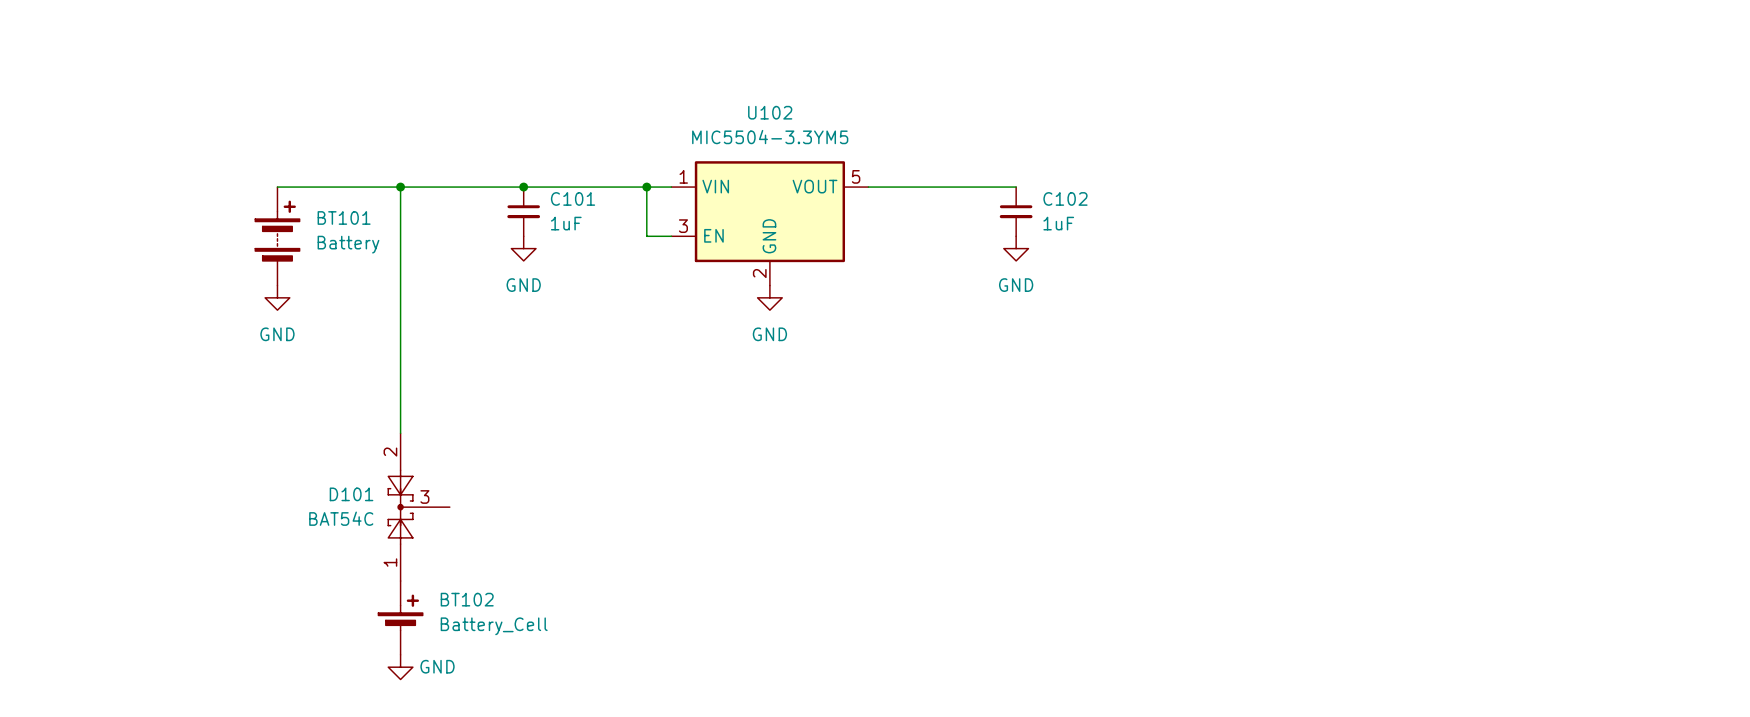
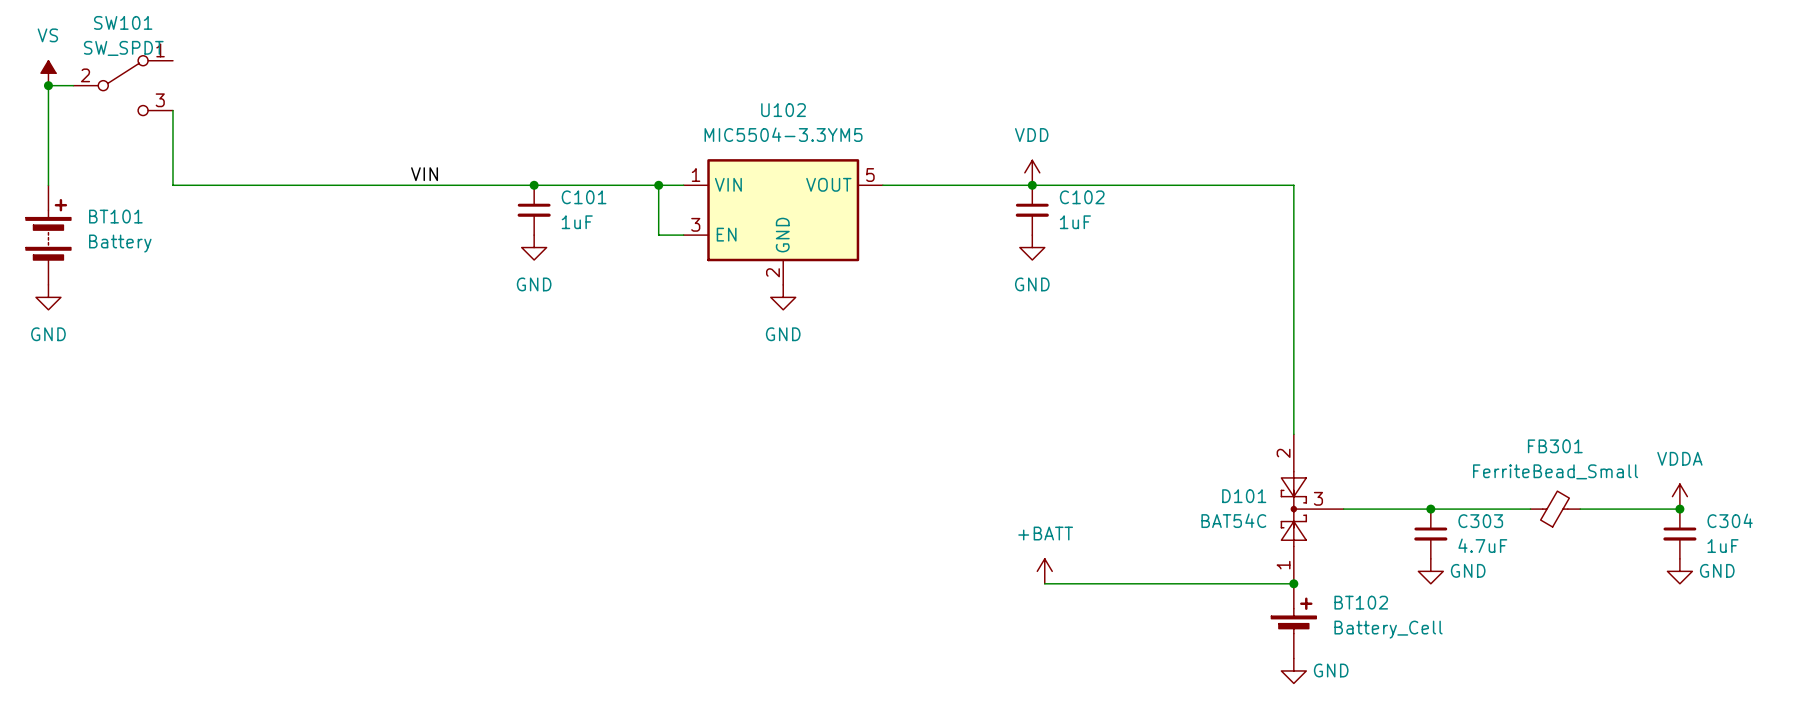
power symbol: none -> VS (48, 73)
junction: none -> (48, 85)
wire: none -> (73, 85) (48, 85) (48, 185)
SW101: none -> SW_SPDT (123, 85)
wire: none -> (172, 110) (172, 185) (285, 185)
power symbol: none -> VDD (1032, 172)
label: none -> VIN (424, 174)
wire: (400, 187) (400, 433) -> none
junction: (400, 187) -> none
wire: none -> (1032, 185) (1293, 185) (1293, 434)
junction: none -> (1032, 185)
BT101 position: (277, 236) -> (48, 235)
power symbol position: GND (277, 297) -> GND (48, 297)
power symbol: none -> VDDA (1679, 496)
D101 position: (419, 507) -> (1312, 509)
wire: none -> (1343, 509) (1530, 509)
junction: none -> (1430, 509)
FB301: none -> FerriteBead_Small (1555, 509)
wire: none -> (1580, 509) (1679, 509)
junction: none -> (1679, 509)
C303: none -> (1430, 533)
C304: none -> (1679, 533)
power symbol: none -> +BATT (1044, 571)
power symbol: none -> GND (1430, 571)
power symbol: none -> GND (1679, 571)
wire: none -> (1044, 583) (1293, 583)
junction: none -> (1293, 583)
BT102 position: (400, 617) -> (1293, 621)
power symbol: GND (400, 667) -> none
power symbol: none -> GND (1293, 670)

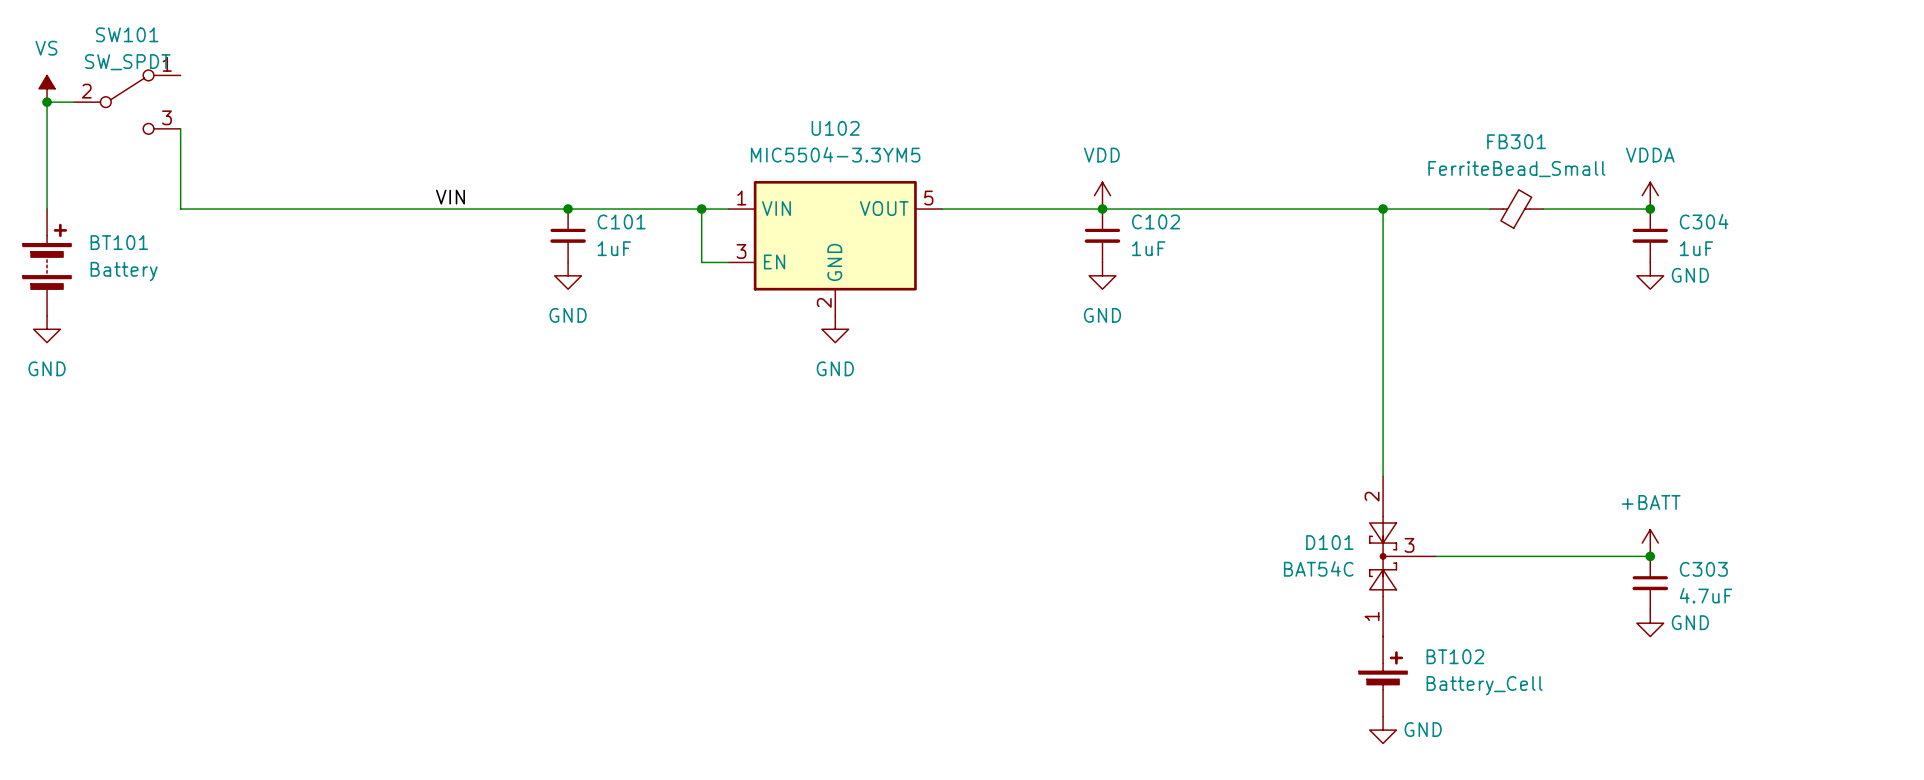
power symbol: none -> VDDA (1650, 195)
wire: none -> (1383, 209) (1489, 209)
junction: none -> (1383, 209)
wire: none -> (1543, 209) (1650, 209)
junction: none -> (1650, 209)
power symbol: none -> GND (1650, 275)
power symbol: none -> +BATT (1650, 543)
power symbol: VDDA (1679, 496) -> none
junction: (1430, 509) -> none
junction: none -> (1650, 556)
FB301 position: (1555, 509) -> (1516, 209)
wire: (1580, 509) (1679, 509) -> none
junction: (1679, 509) -> none
C303 position: (1430, 533) -> (1650, 583)
C304 position: (1679, 533) -> (1650, 235)
power symbol: +BATT (1044, 571) -> none
power symbol: GND (1430, 571) -> none
power symbol: none -> GND (1650, 623)
power symbol: GND (1679, 571) -> none
wire: (1044, 583) (1293, 583) -> none
junction: (1293, 583) -> none

